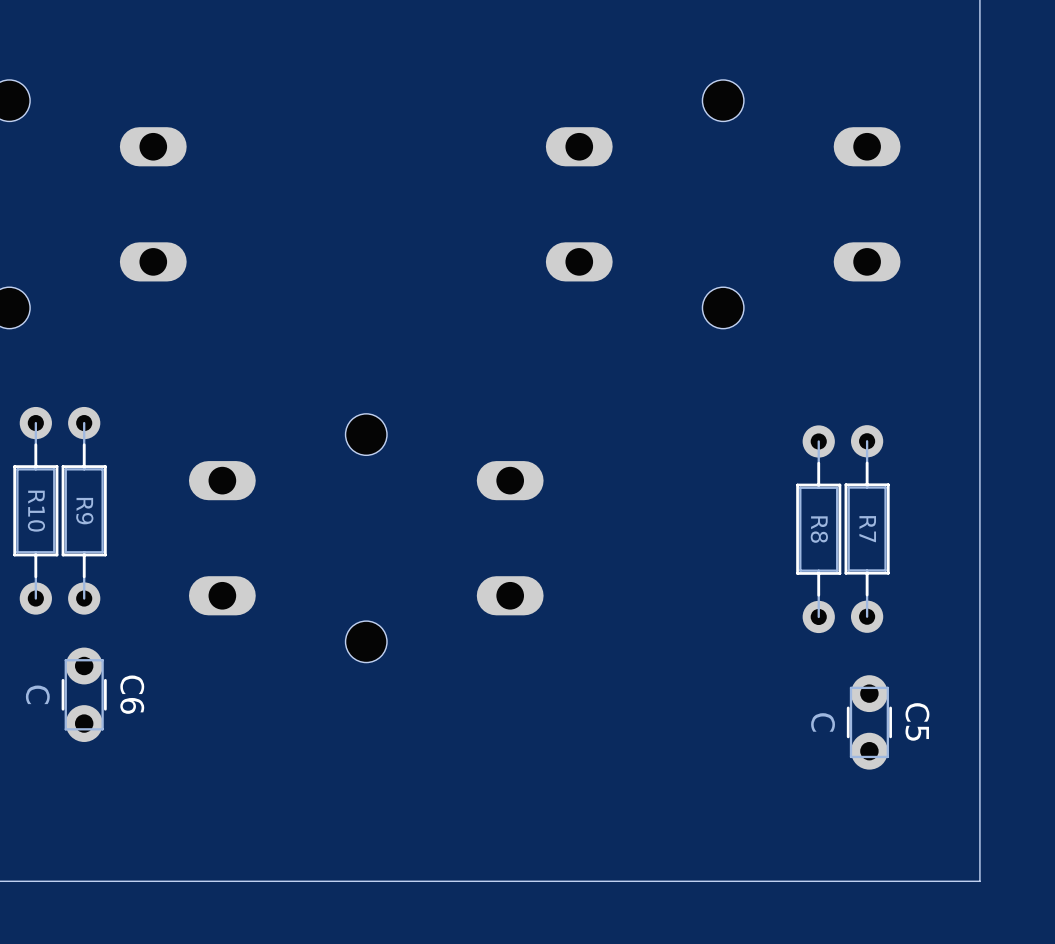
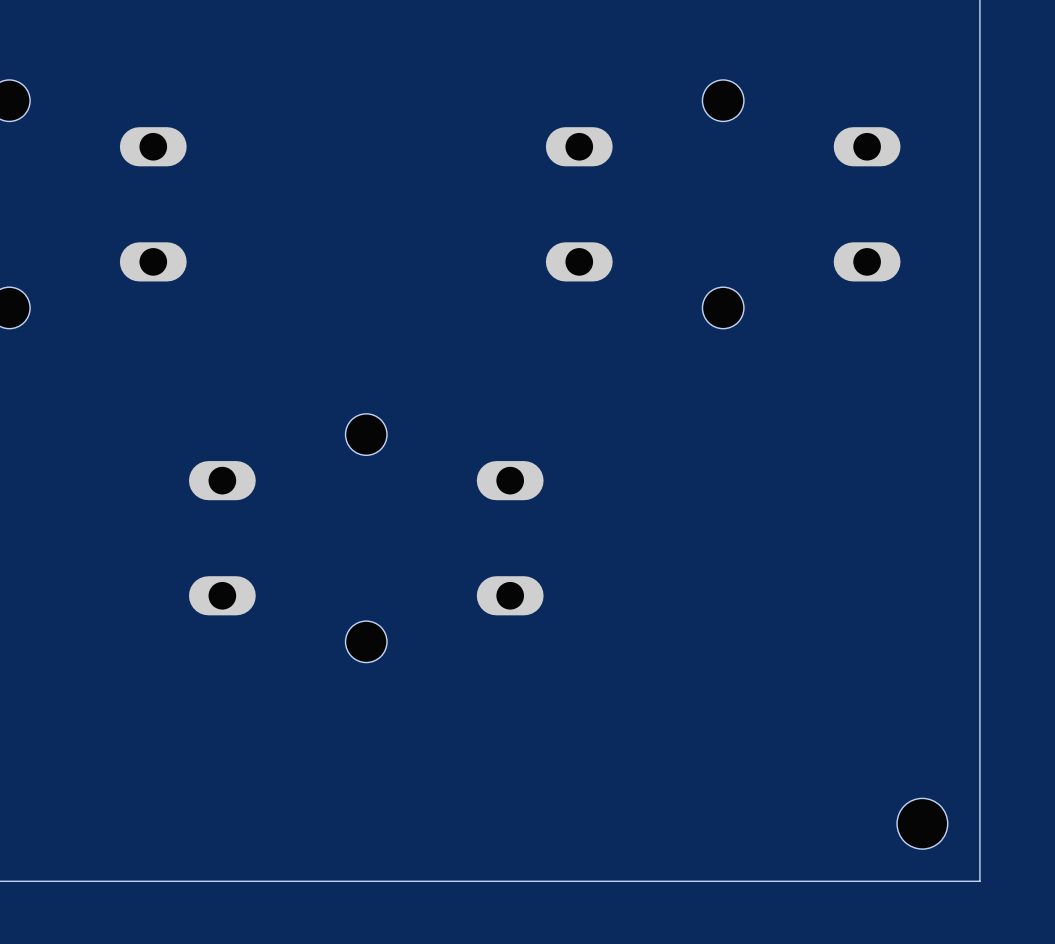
R10: (35, 510) -> none
R9: (84, 510) -> none
R7: (867, 528) -> none
R8: (818, 529) -> none
C6: C (84, 694) -> none
C5: C (869, 722) -> none
part: none -> (922, 823)

